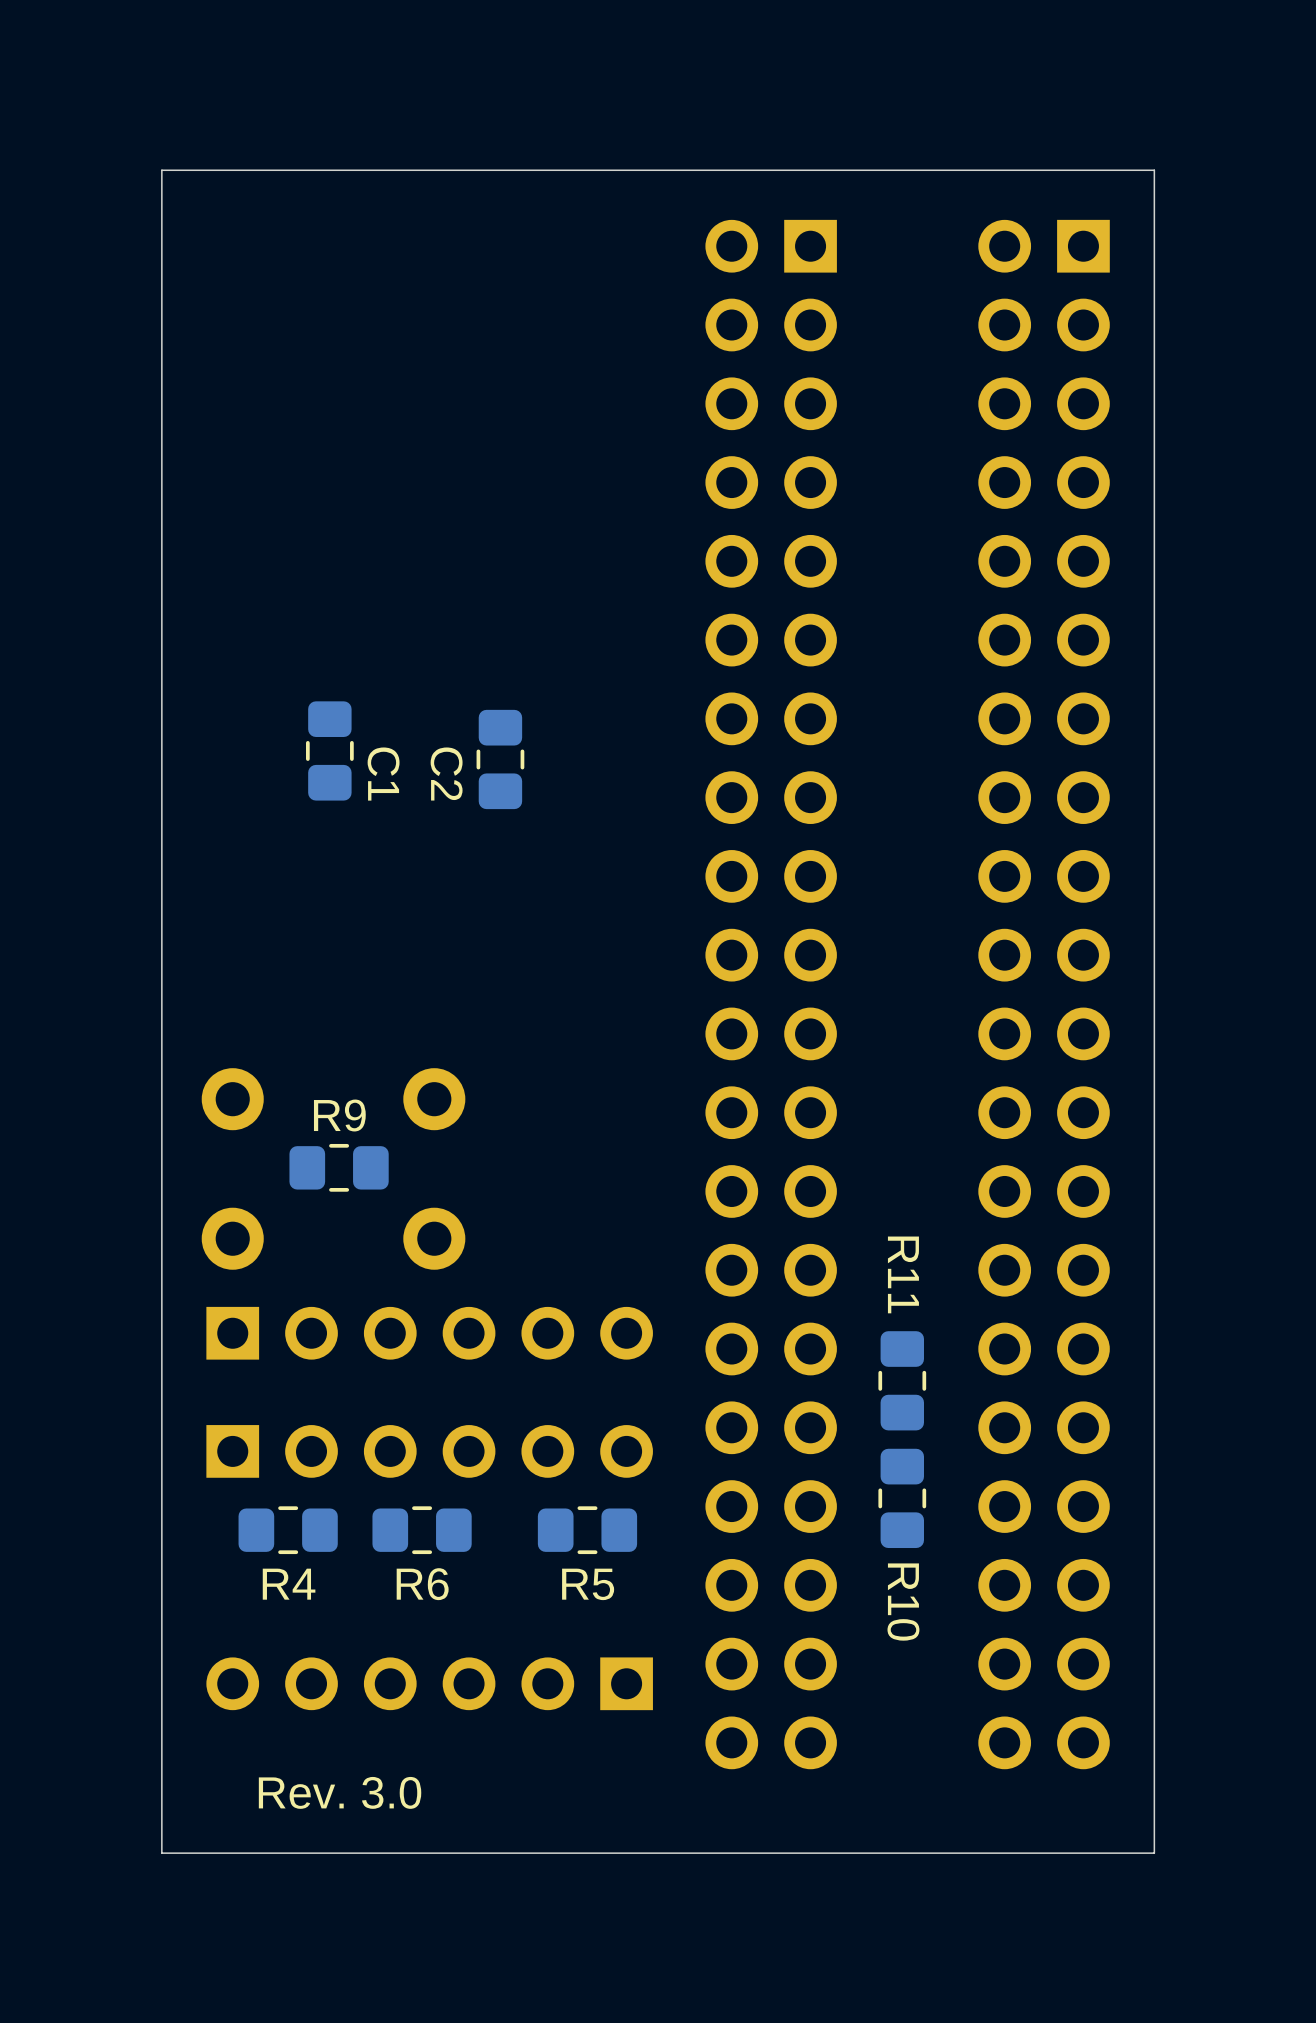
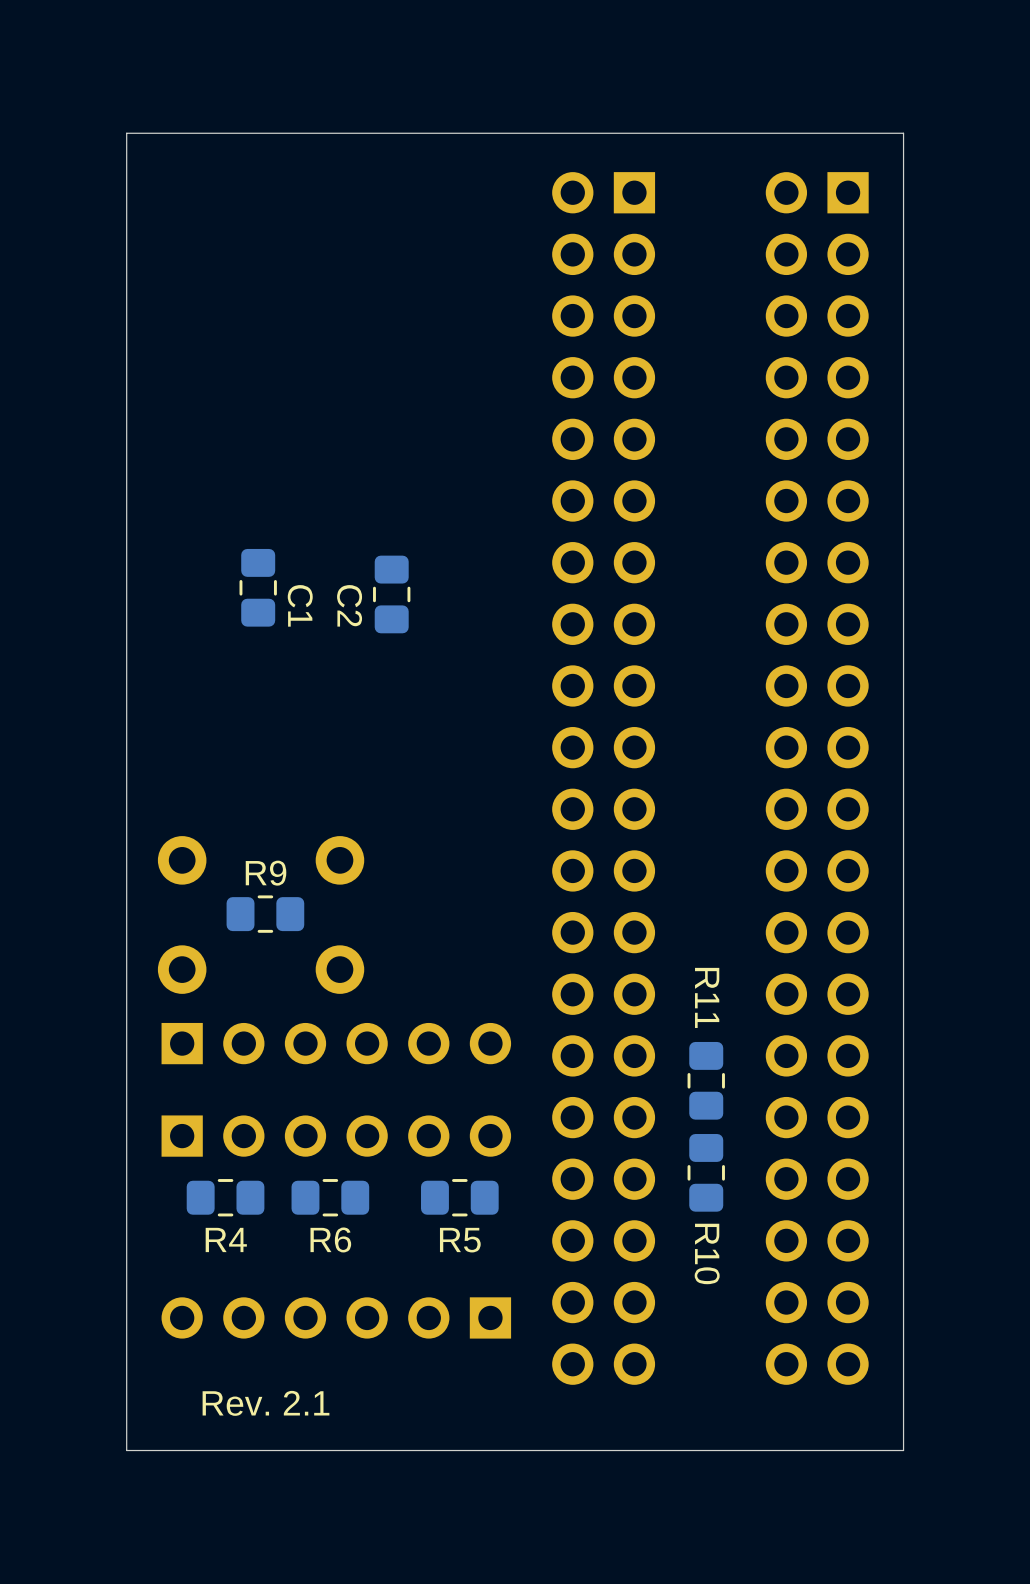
text: Rev. 3.0 (340, 1792) -> Rev. 2.1 (265, 1403)

